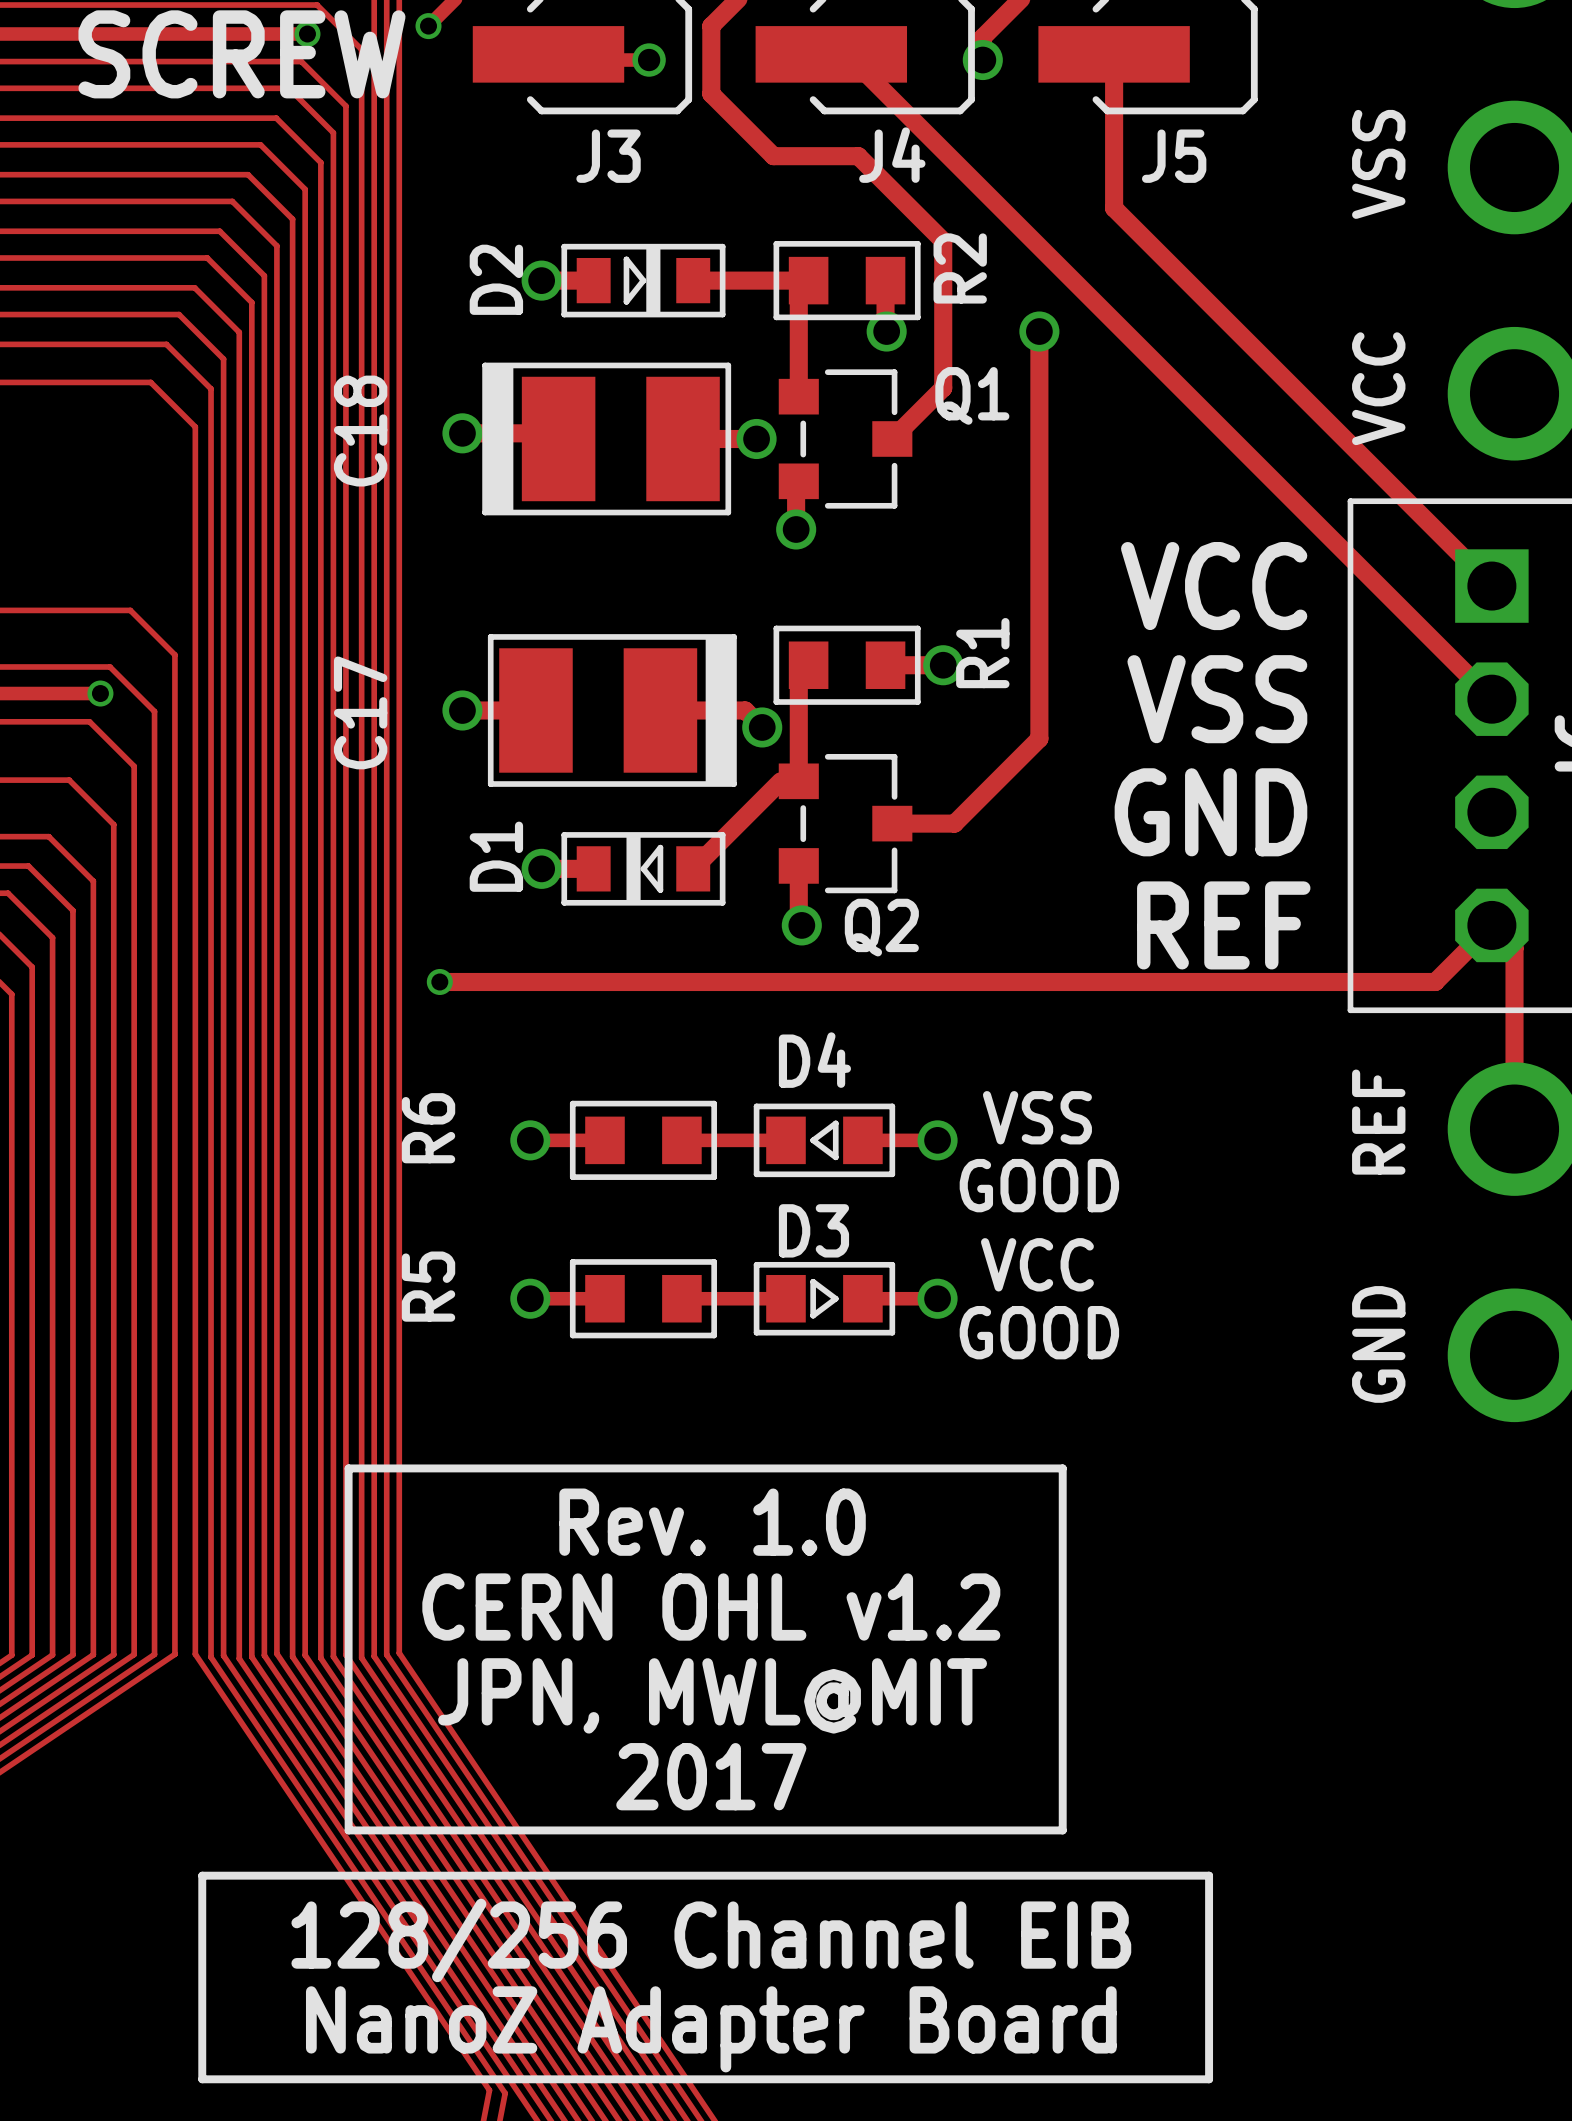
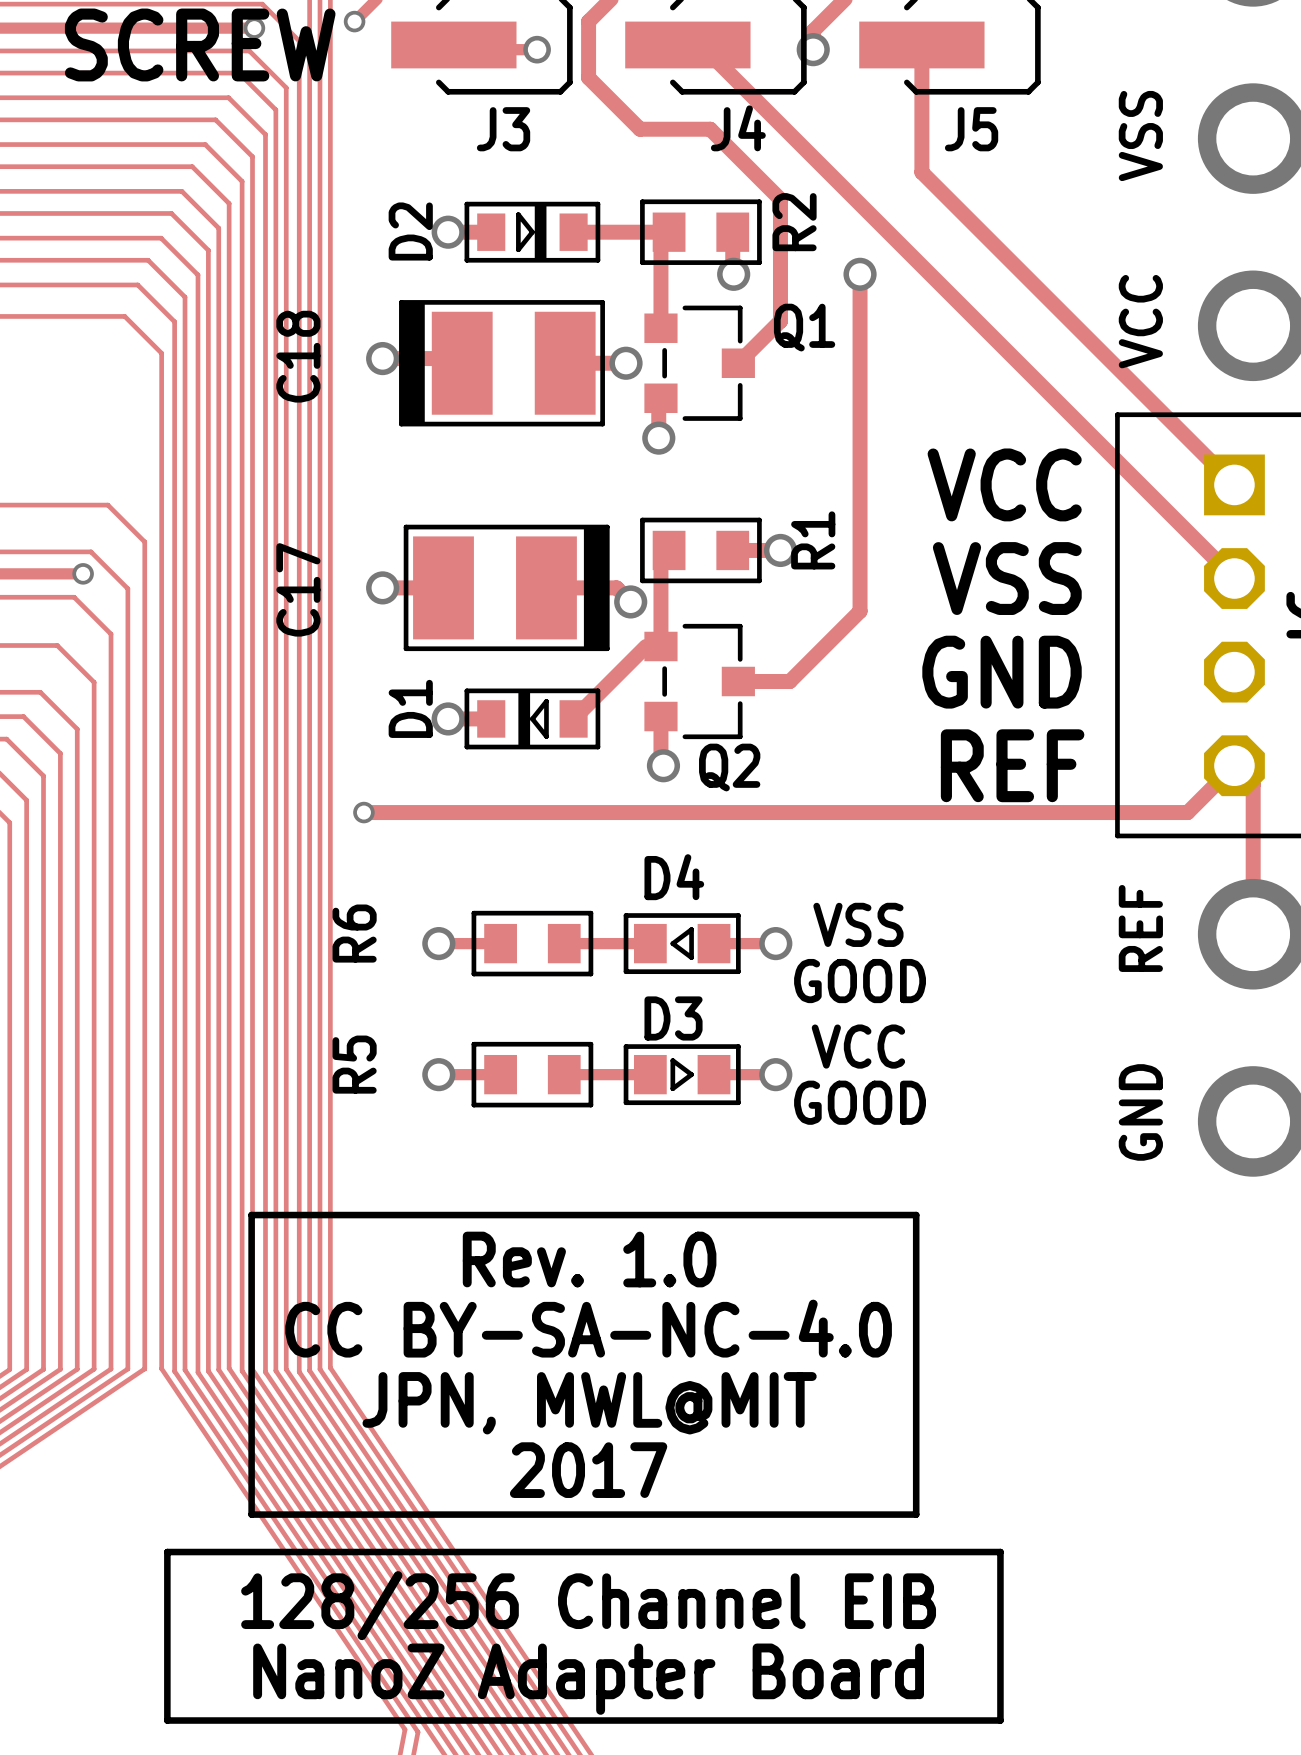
line: (348, 1468) (348, 1830) -> (288, 1215) (251, 1215) (251, 1514) (288, 1514)
line: (1062, 1468) (1062, 1830) -> (879, 1215) (916, 1215) (916, 1514) (879, 1514)
text: CERN OHL v1.2 (711, 1607) -> CC BY-SA-NC-4.0 (588, 1328)

